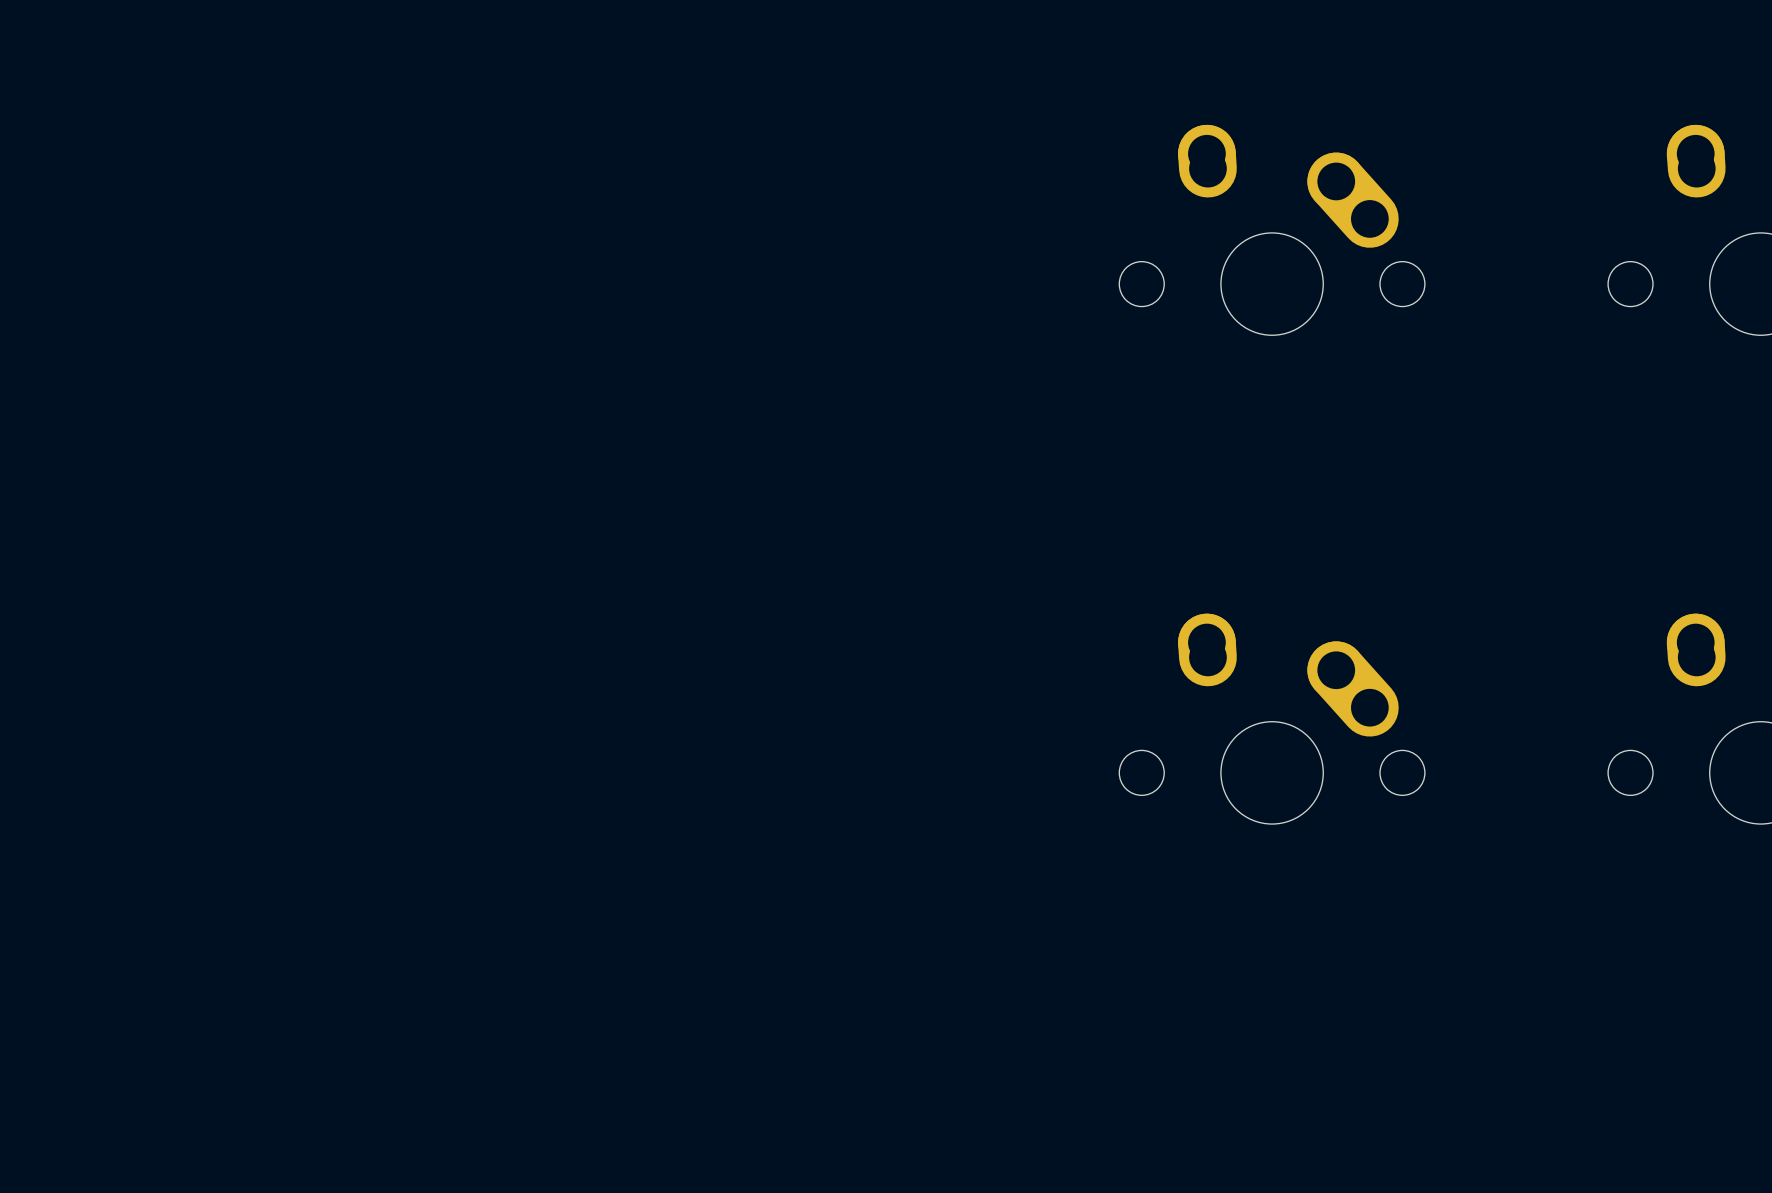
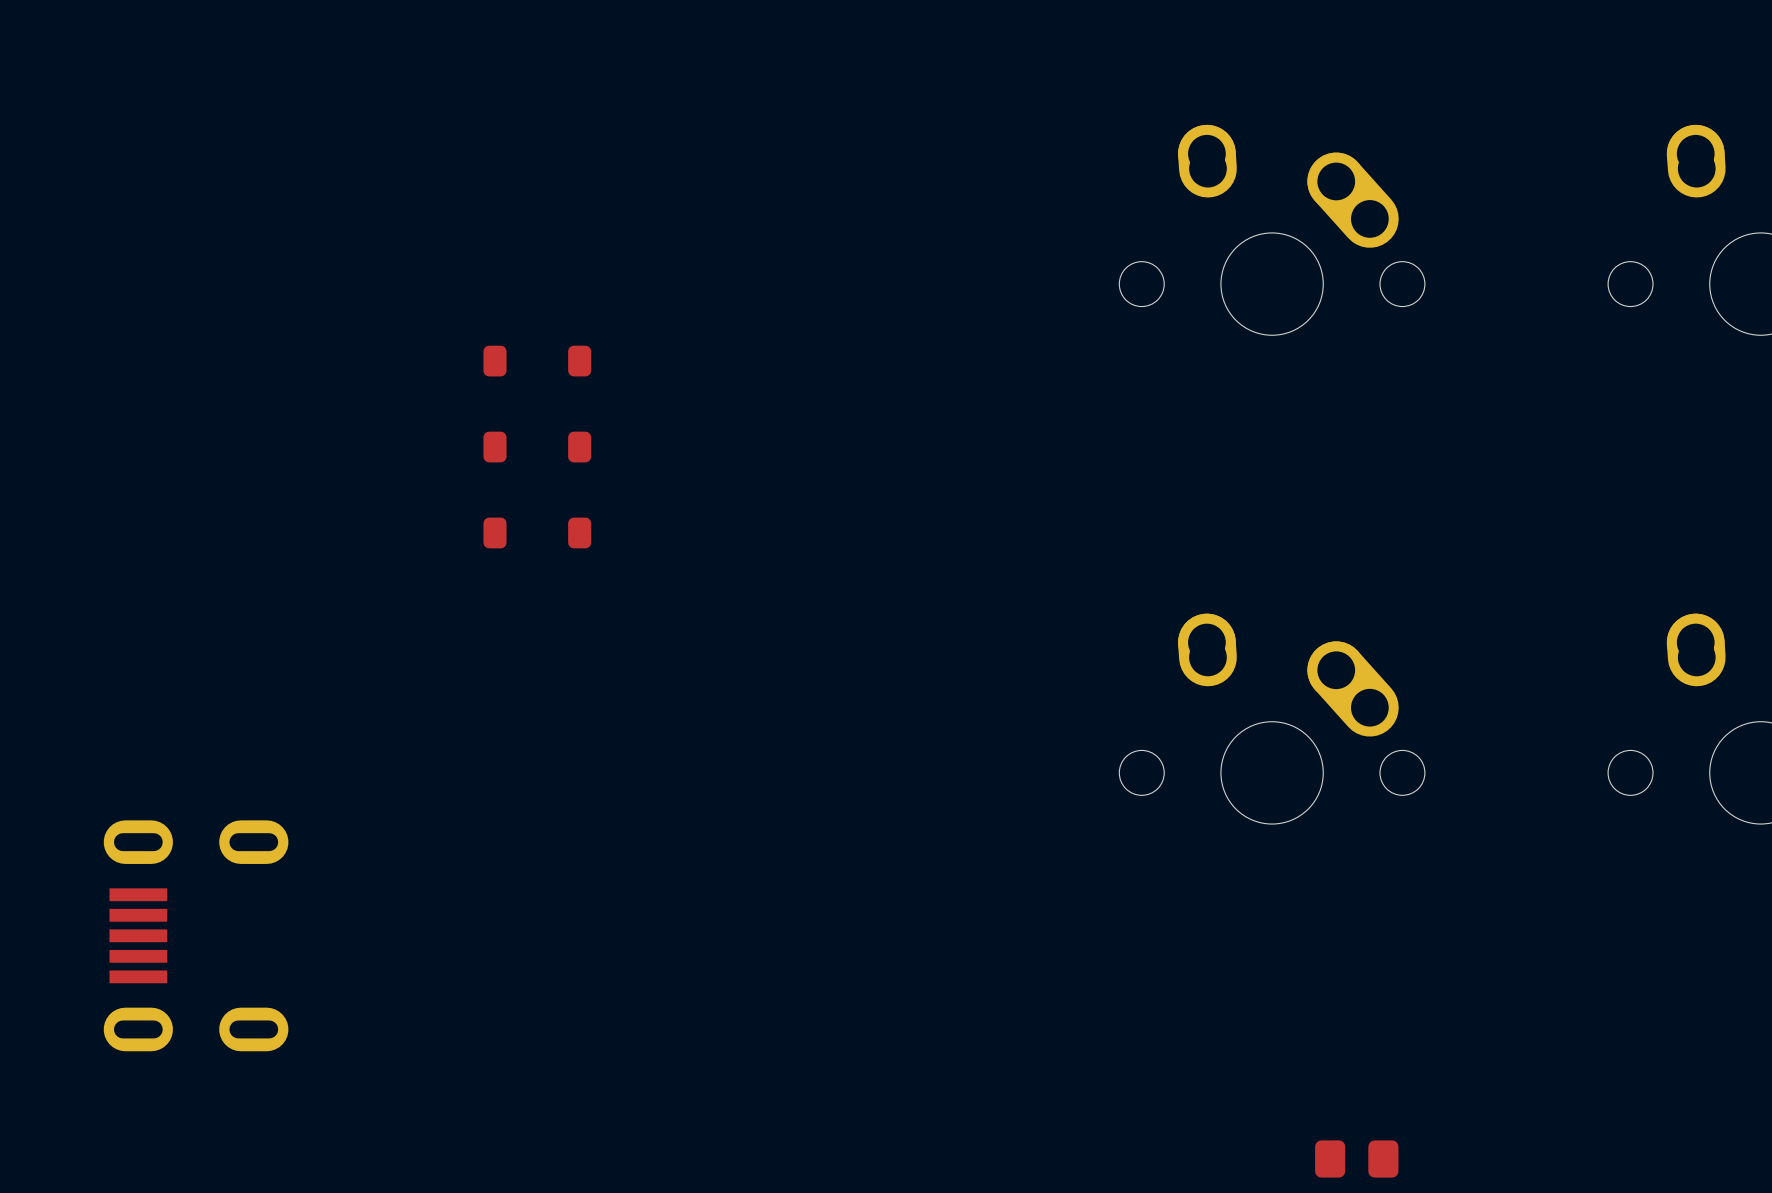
part: none -> (537, 361)
part: none -> (537, 447)
part: none -> (537, 532)
part: none -> (196, 935)
part: none -> (1356, 1158)

